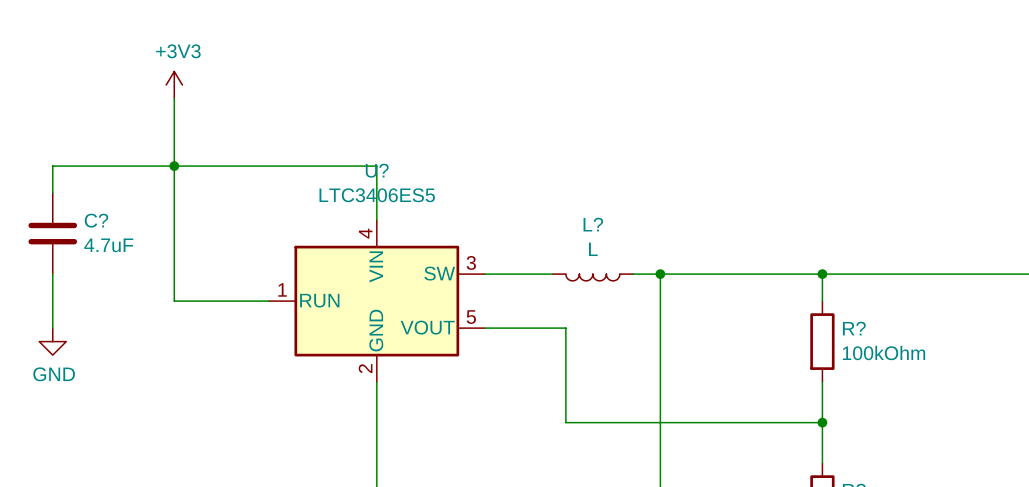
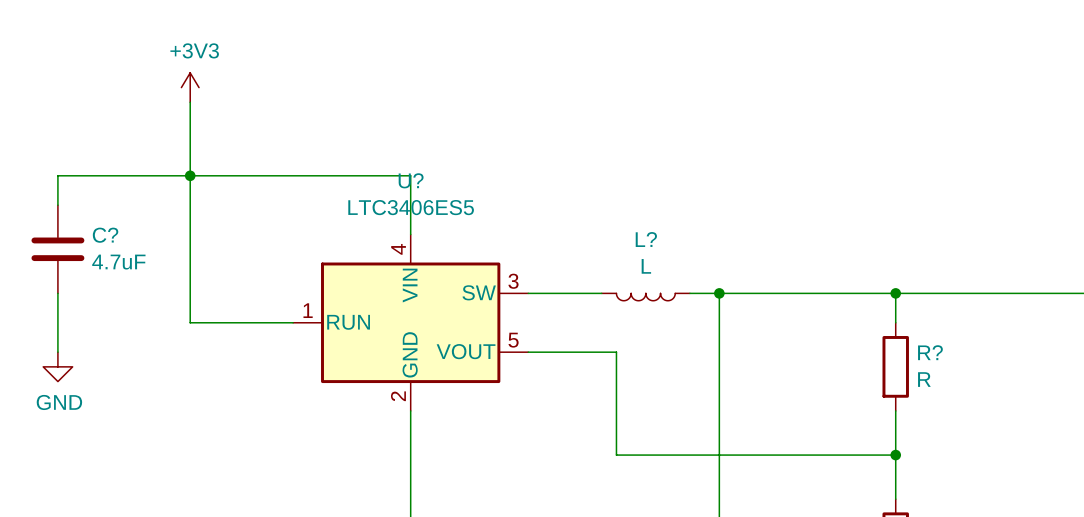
R? value: 100kOhm (883, 352) -> R (924, 379)

